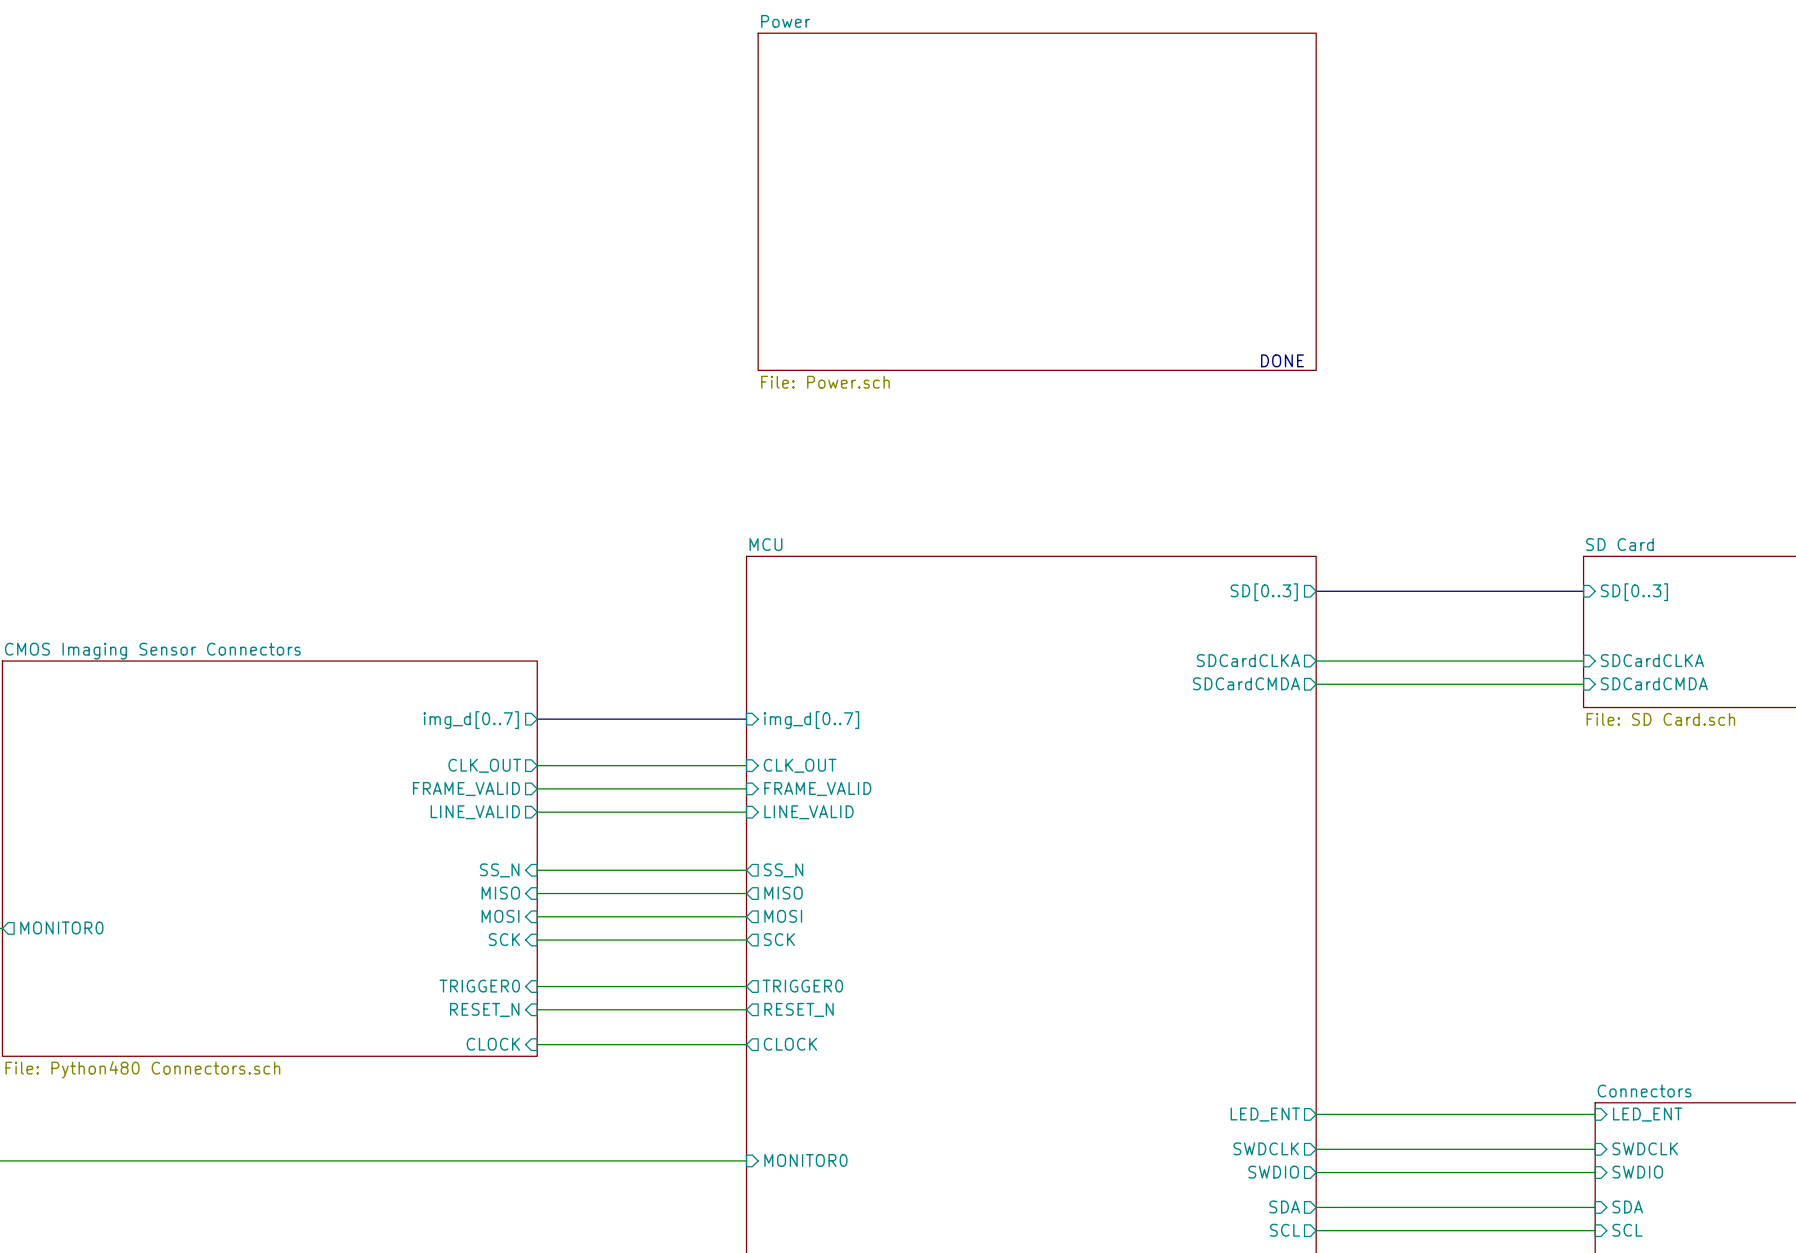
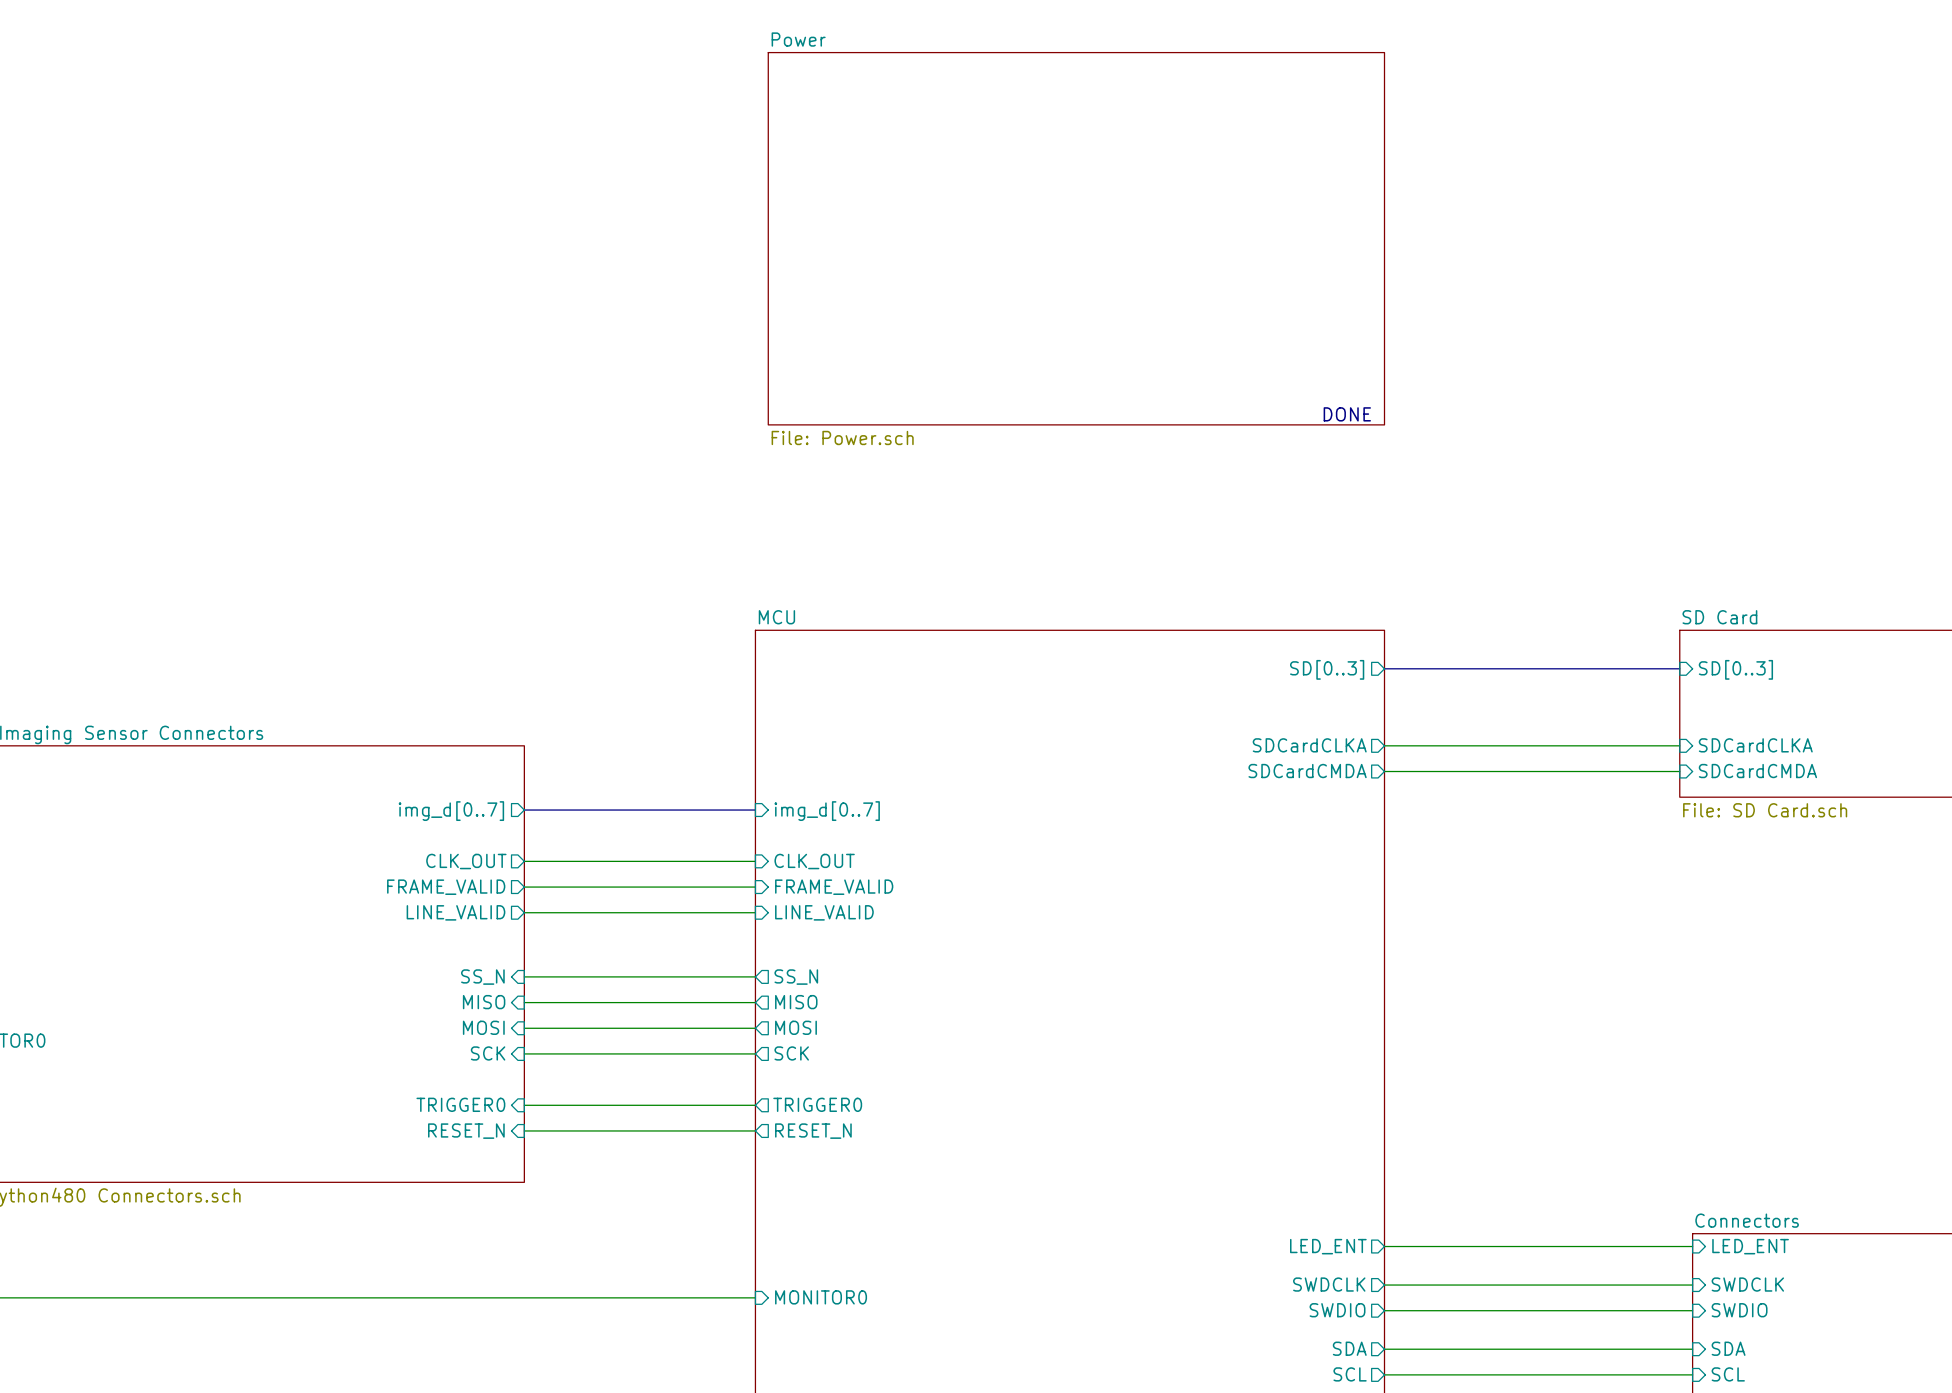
sheet pin: CLOCK (493, 1044) -> none
wire: (537, 1044) (746, 1044) -> none
sheet pin: CLOCK (790, 1044) -> none

